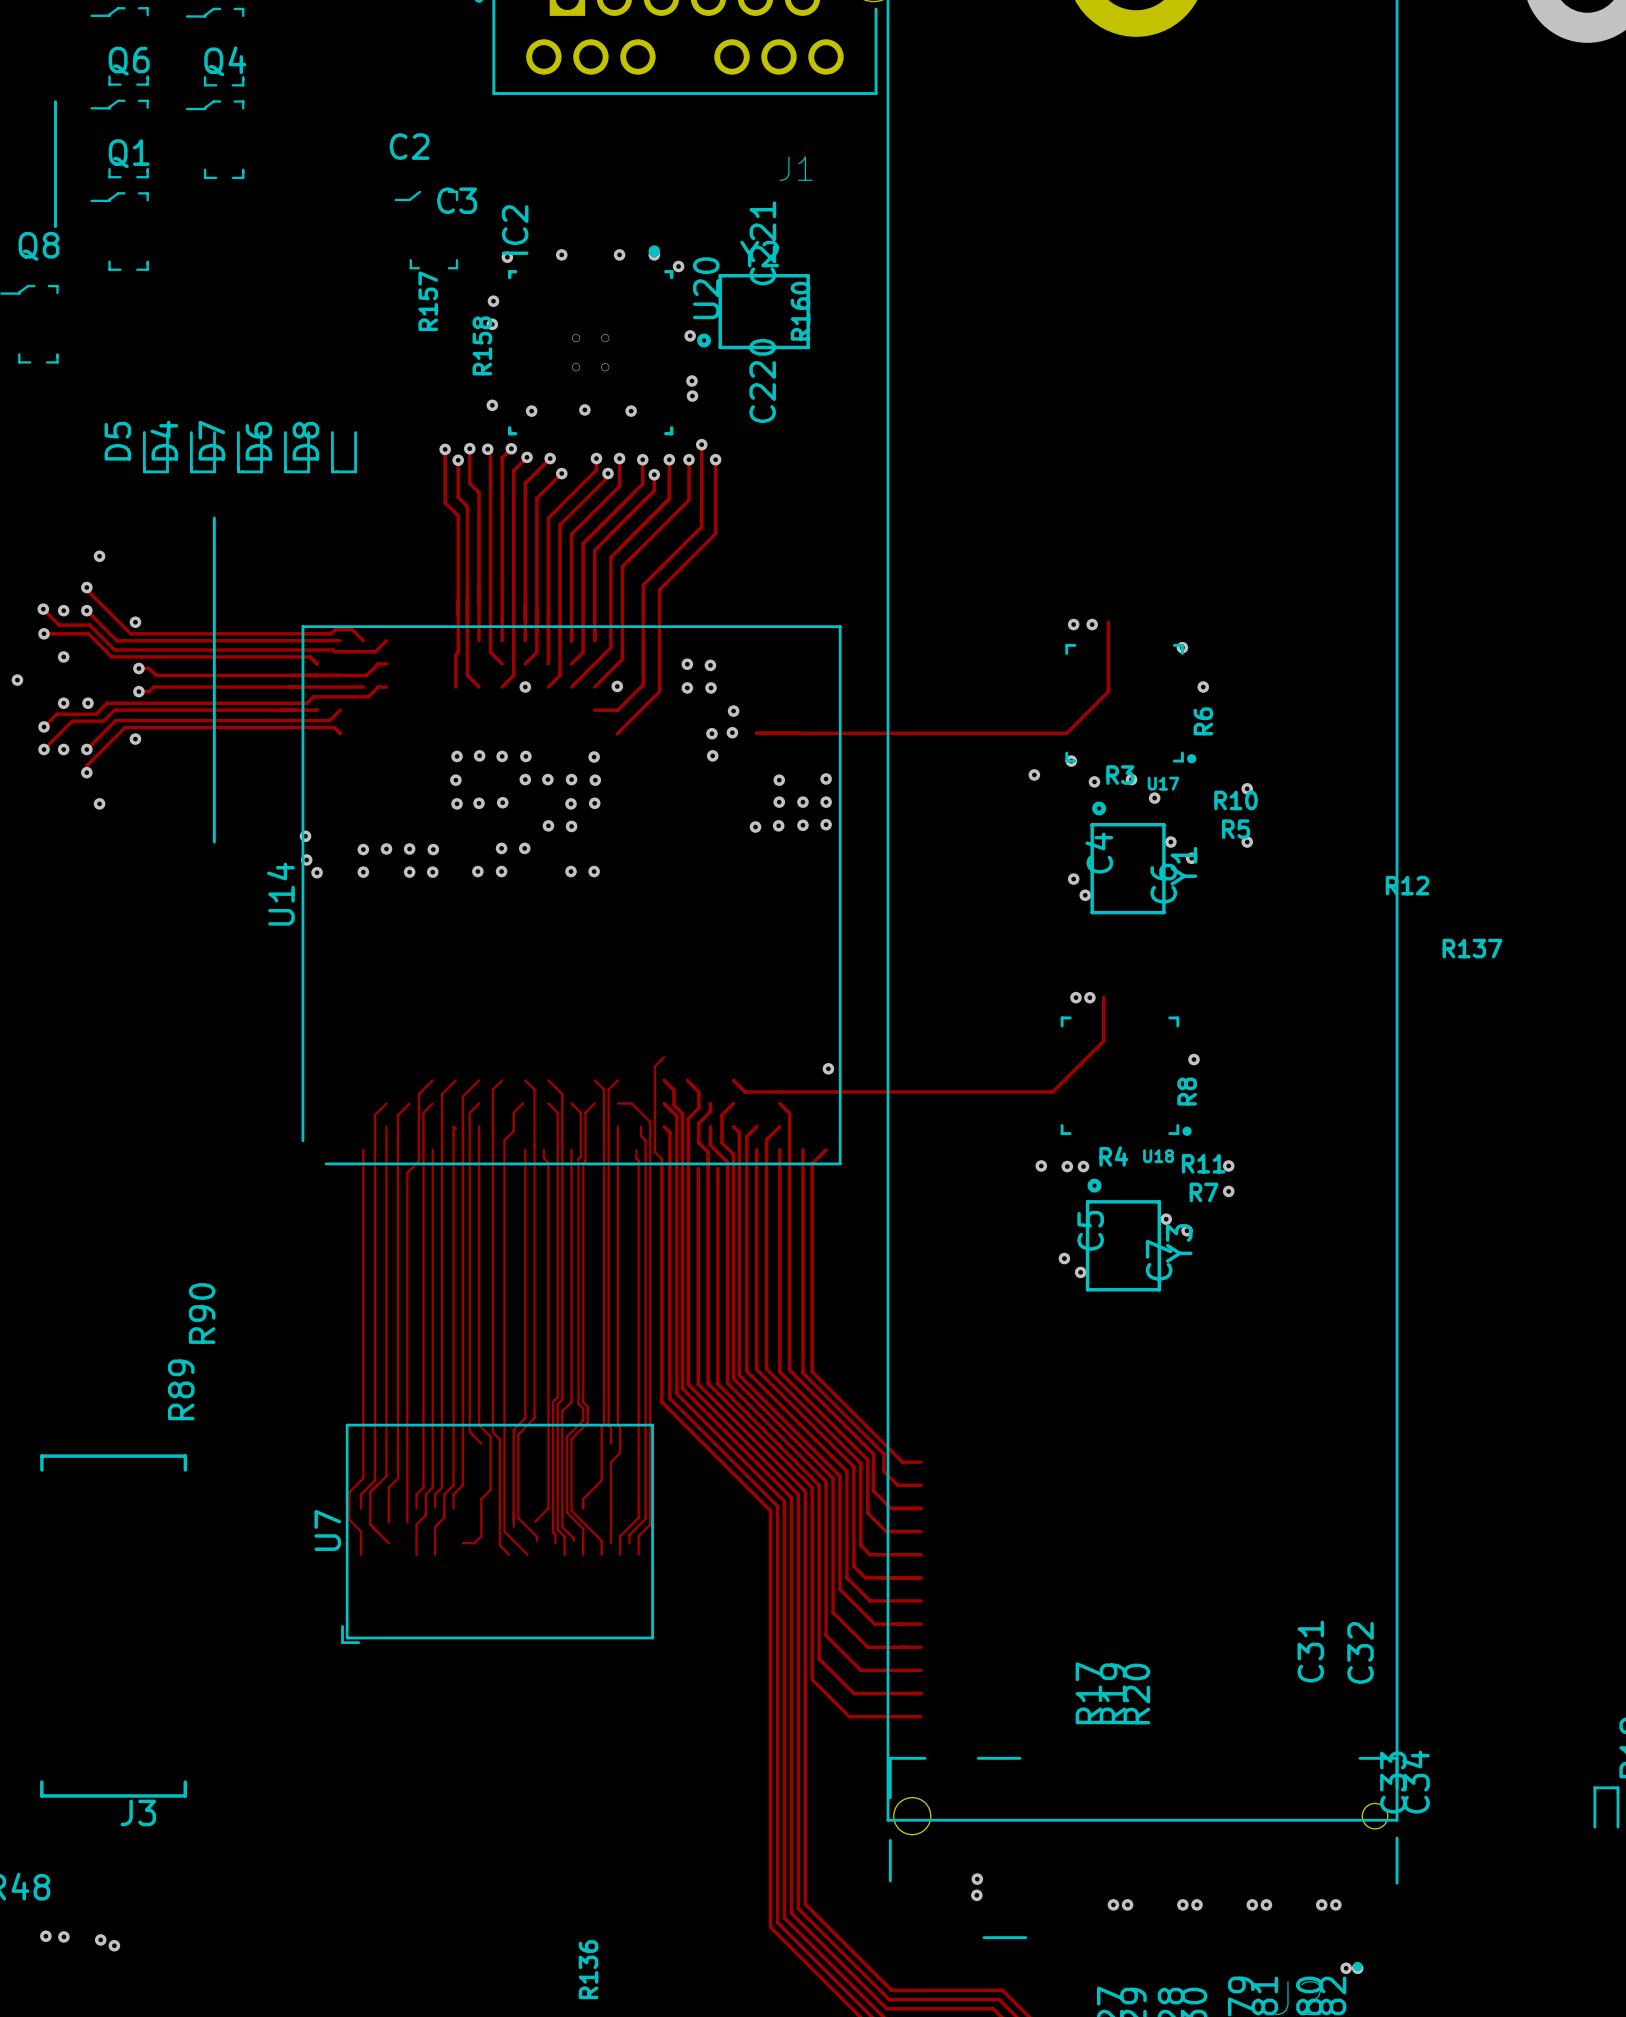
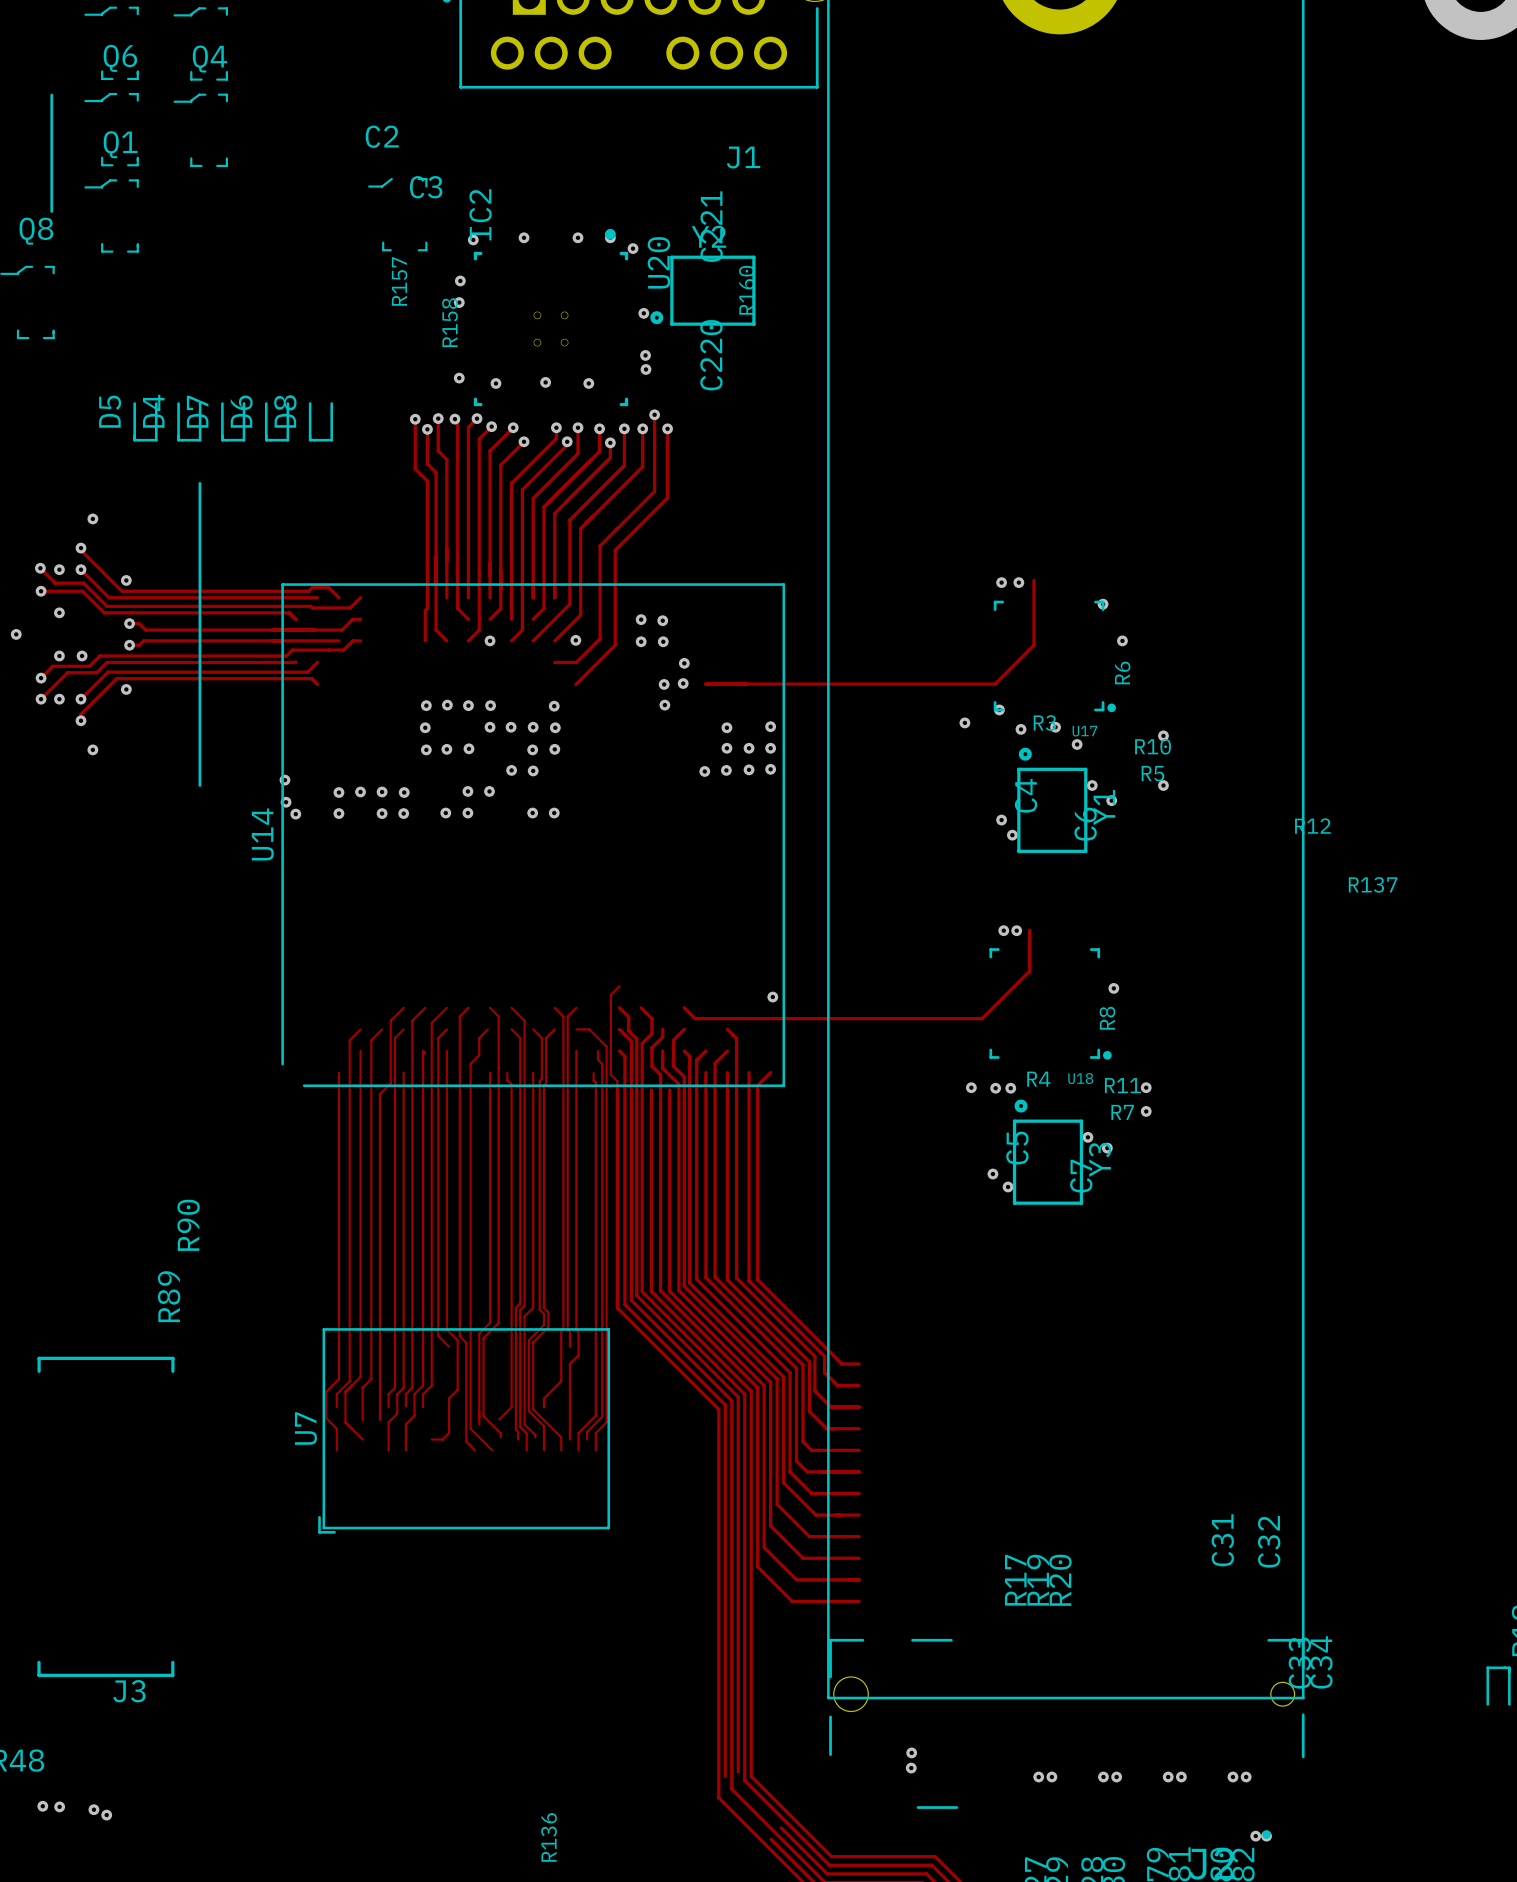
track: (791, 1899) (791, 1913) (837, 1959) -> none
track: (777, 1904) (777, 1922) (826, 1971) -> none

